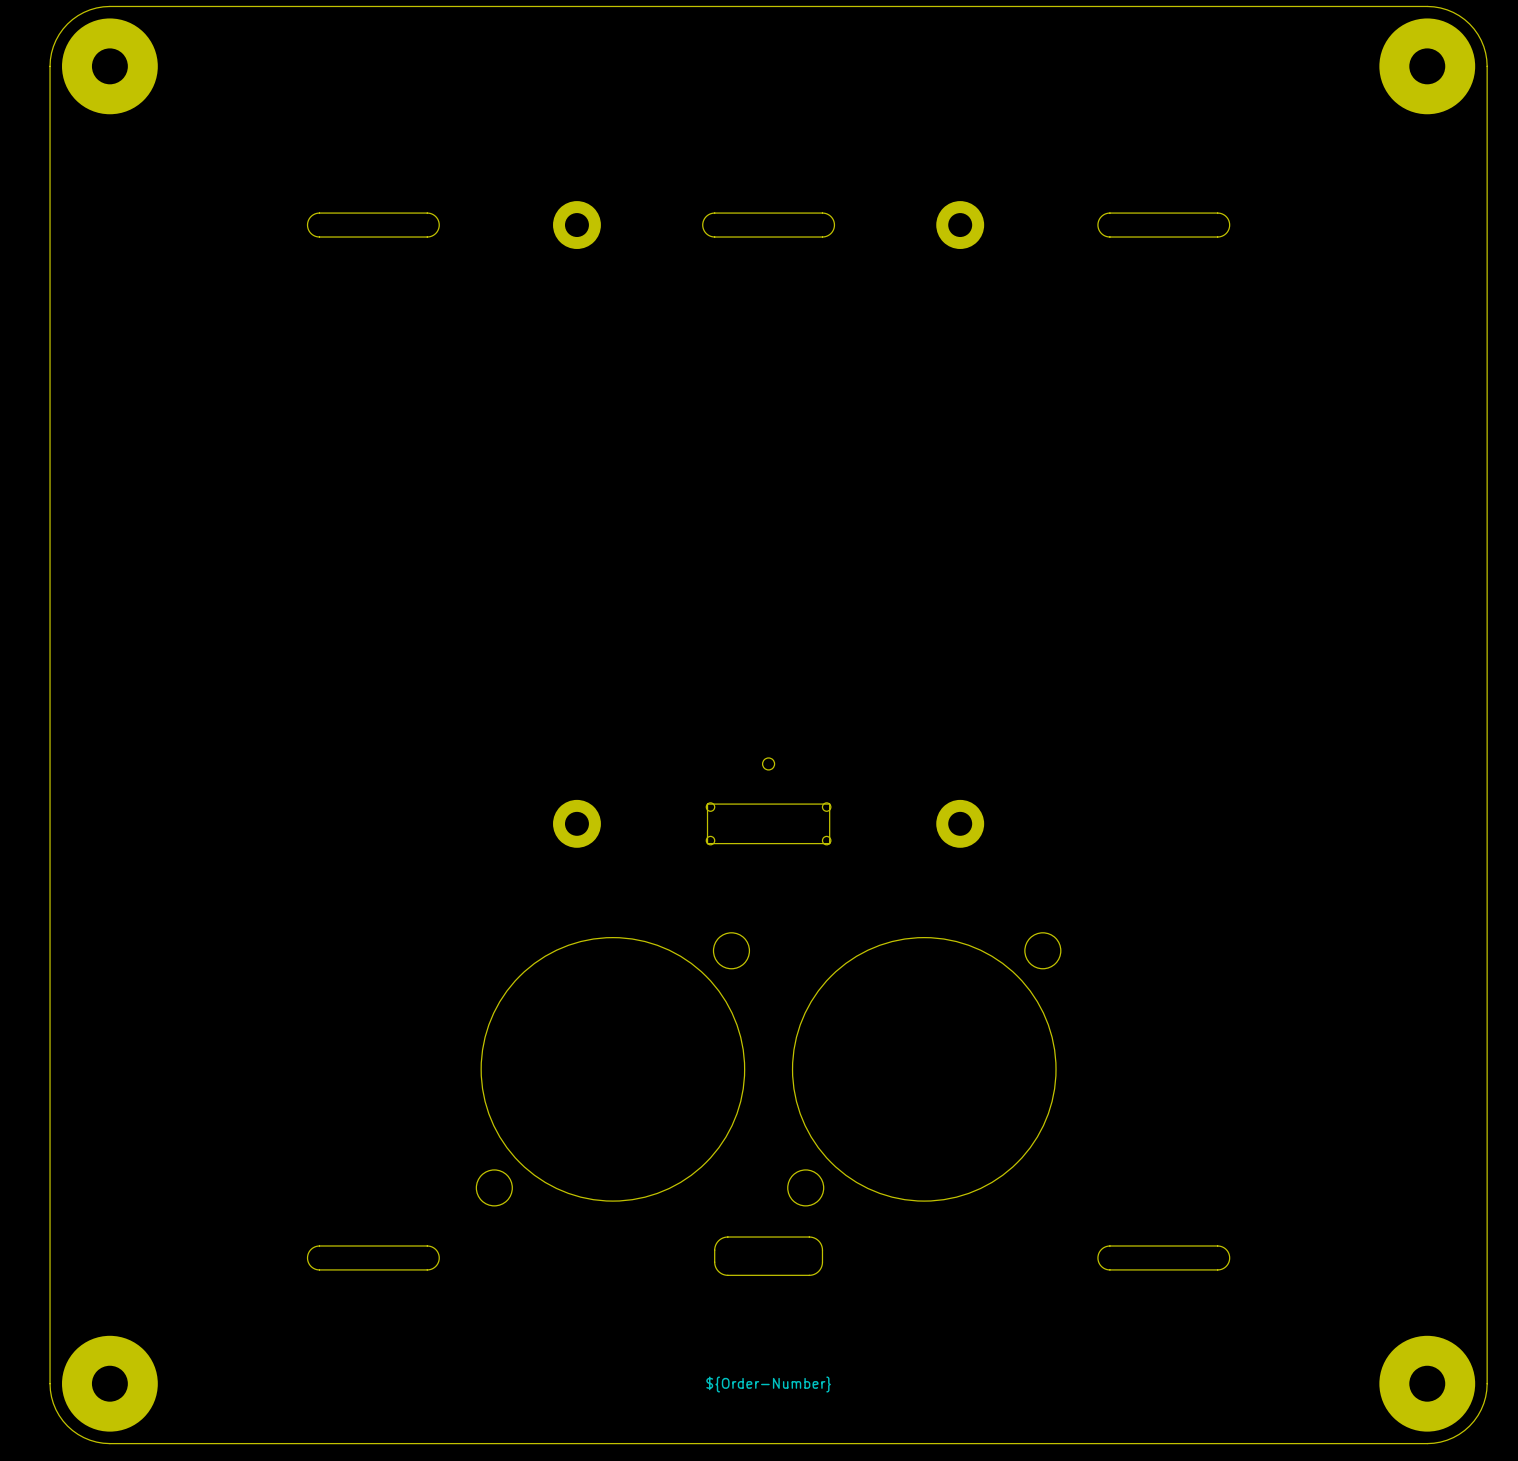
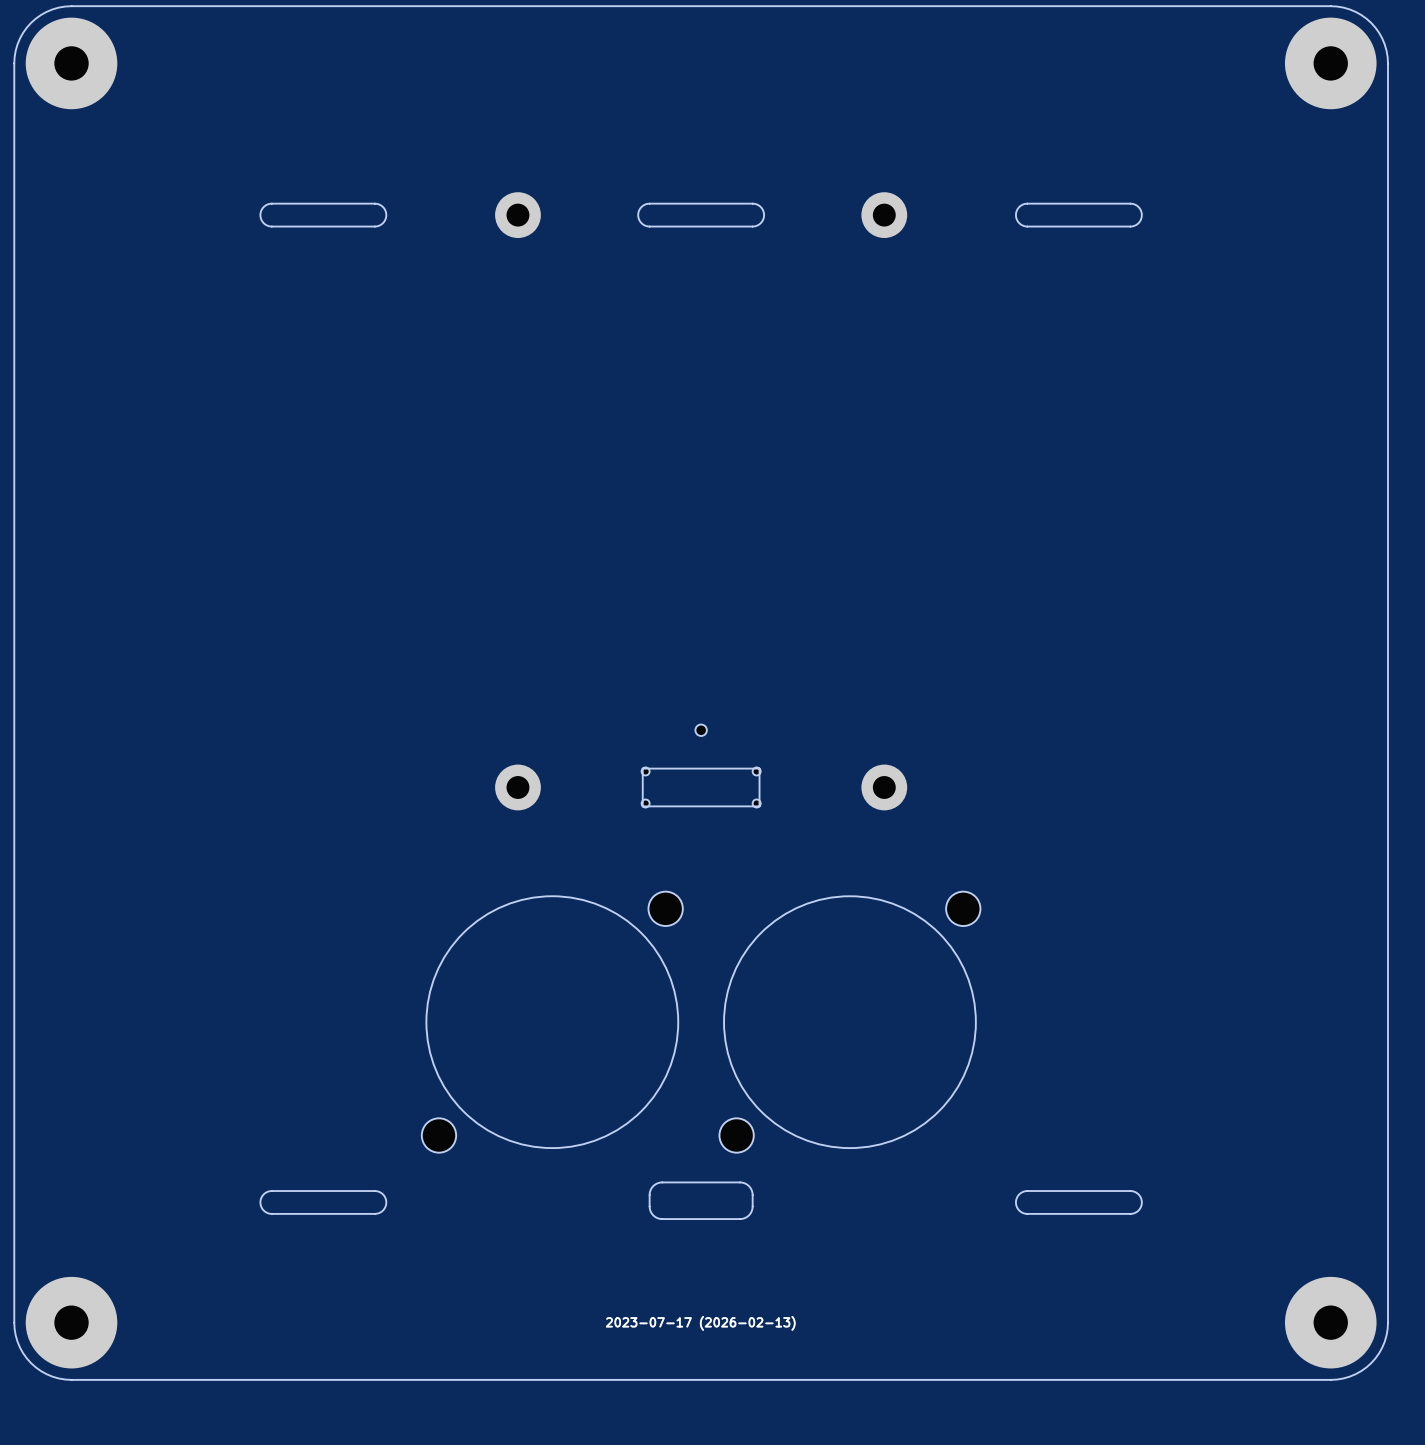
drawing shape: [706, 1376, 831, 1393] -> [606, 1316, 796, 1331]

